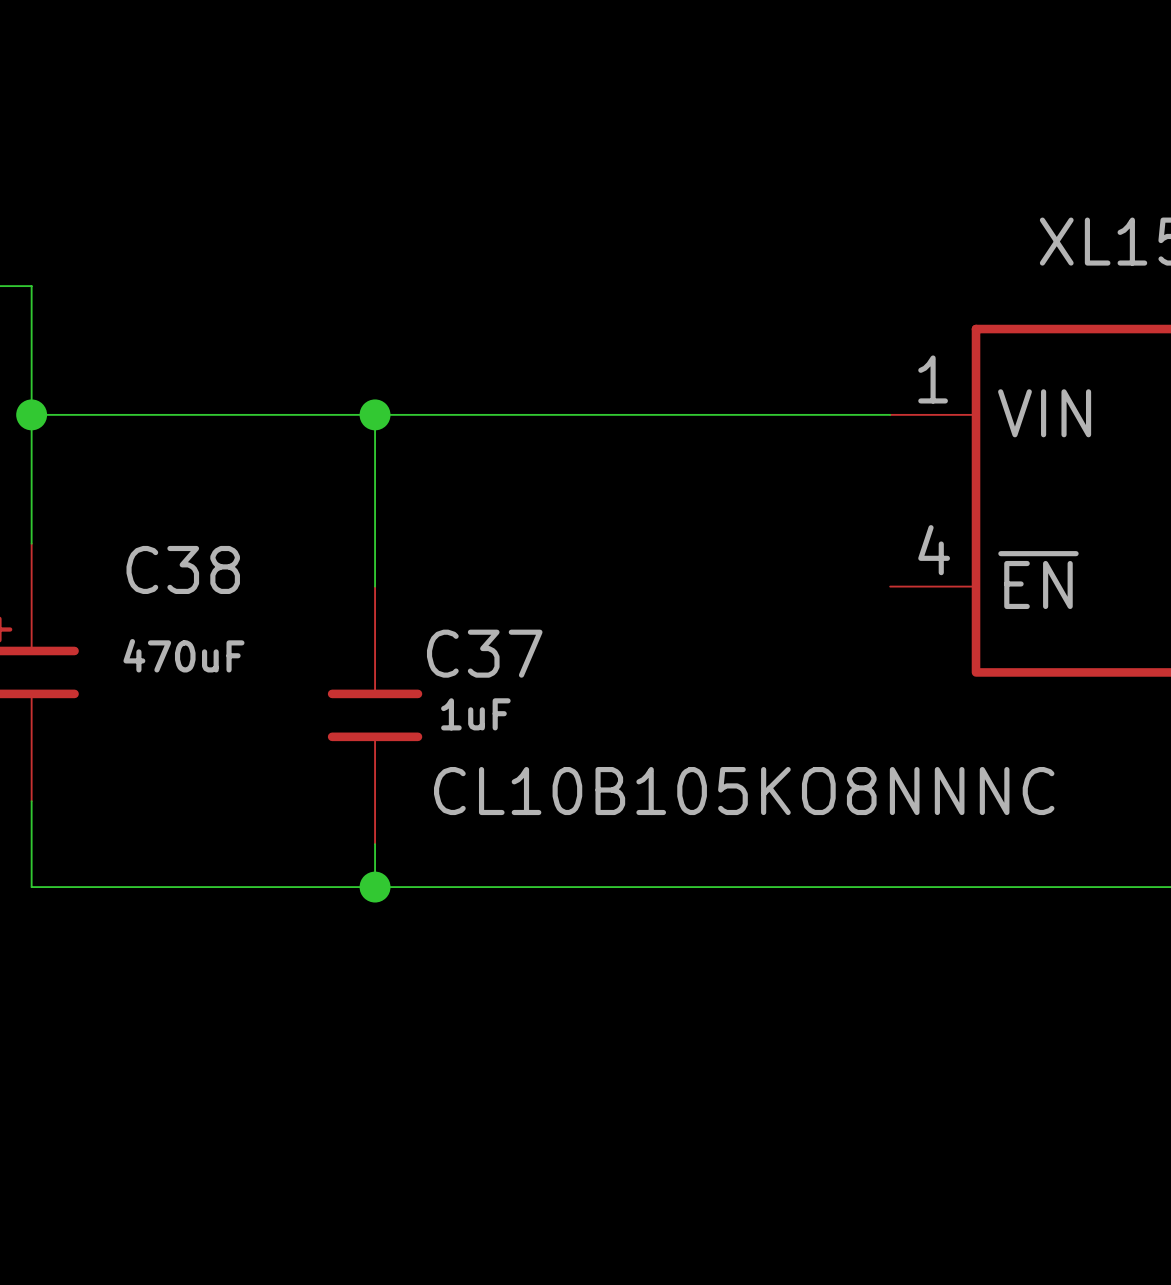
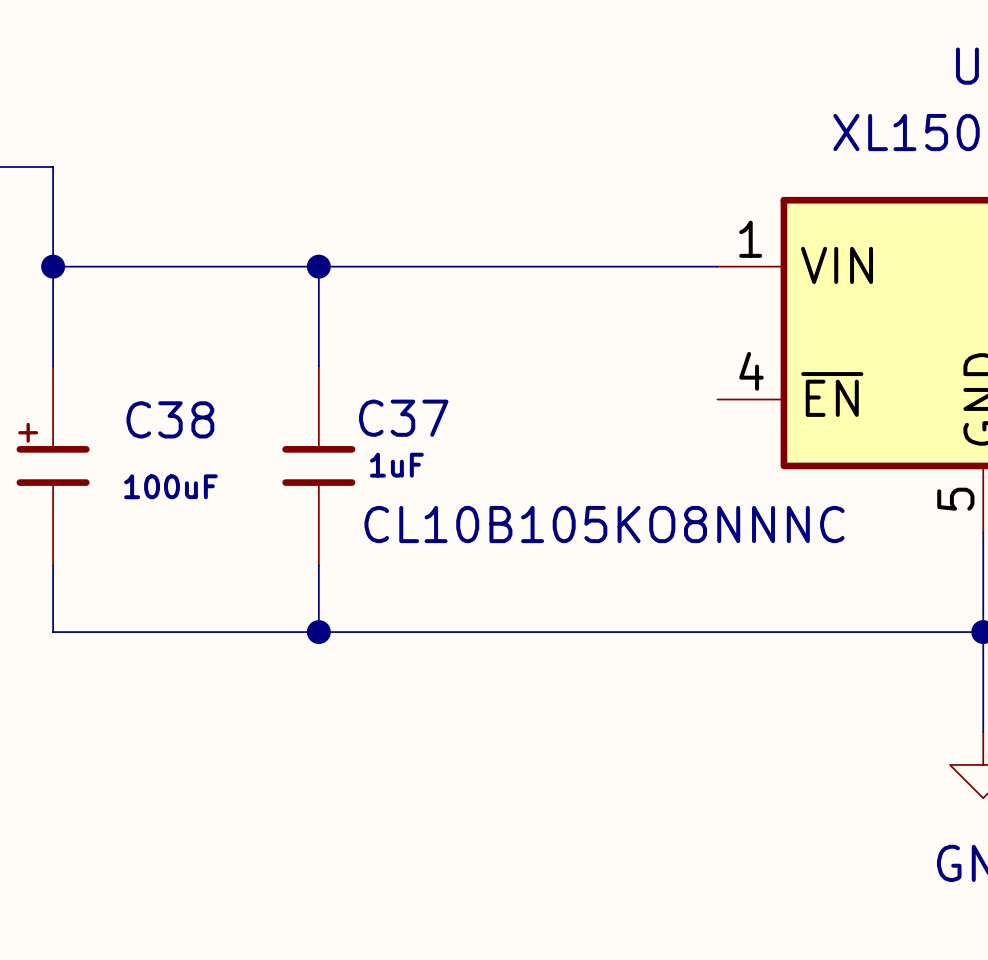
C38 name position: C38 (183, 569) -> C38 (170, 419)
C38 value: 470uF (183, 655) -> 100uF (170, 486)
C37 position: (375, 715) -> (318, 465)

